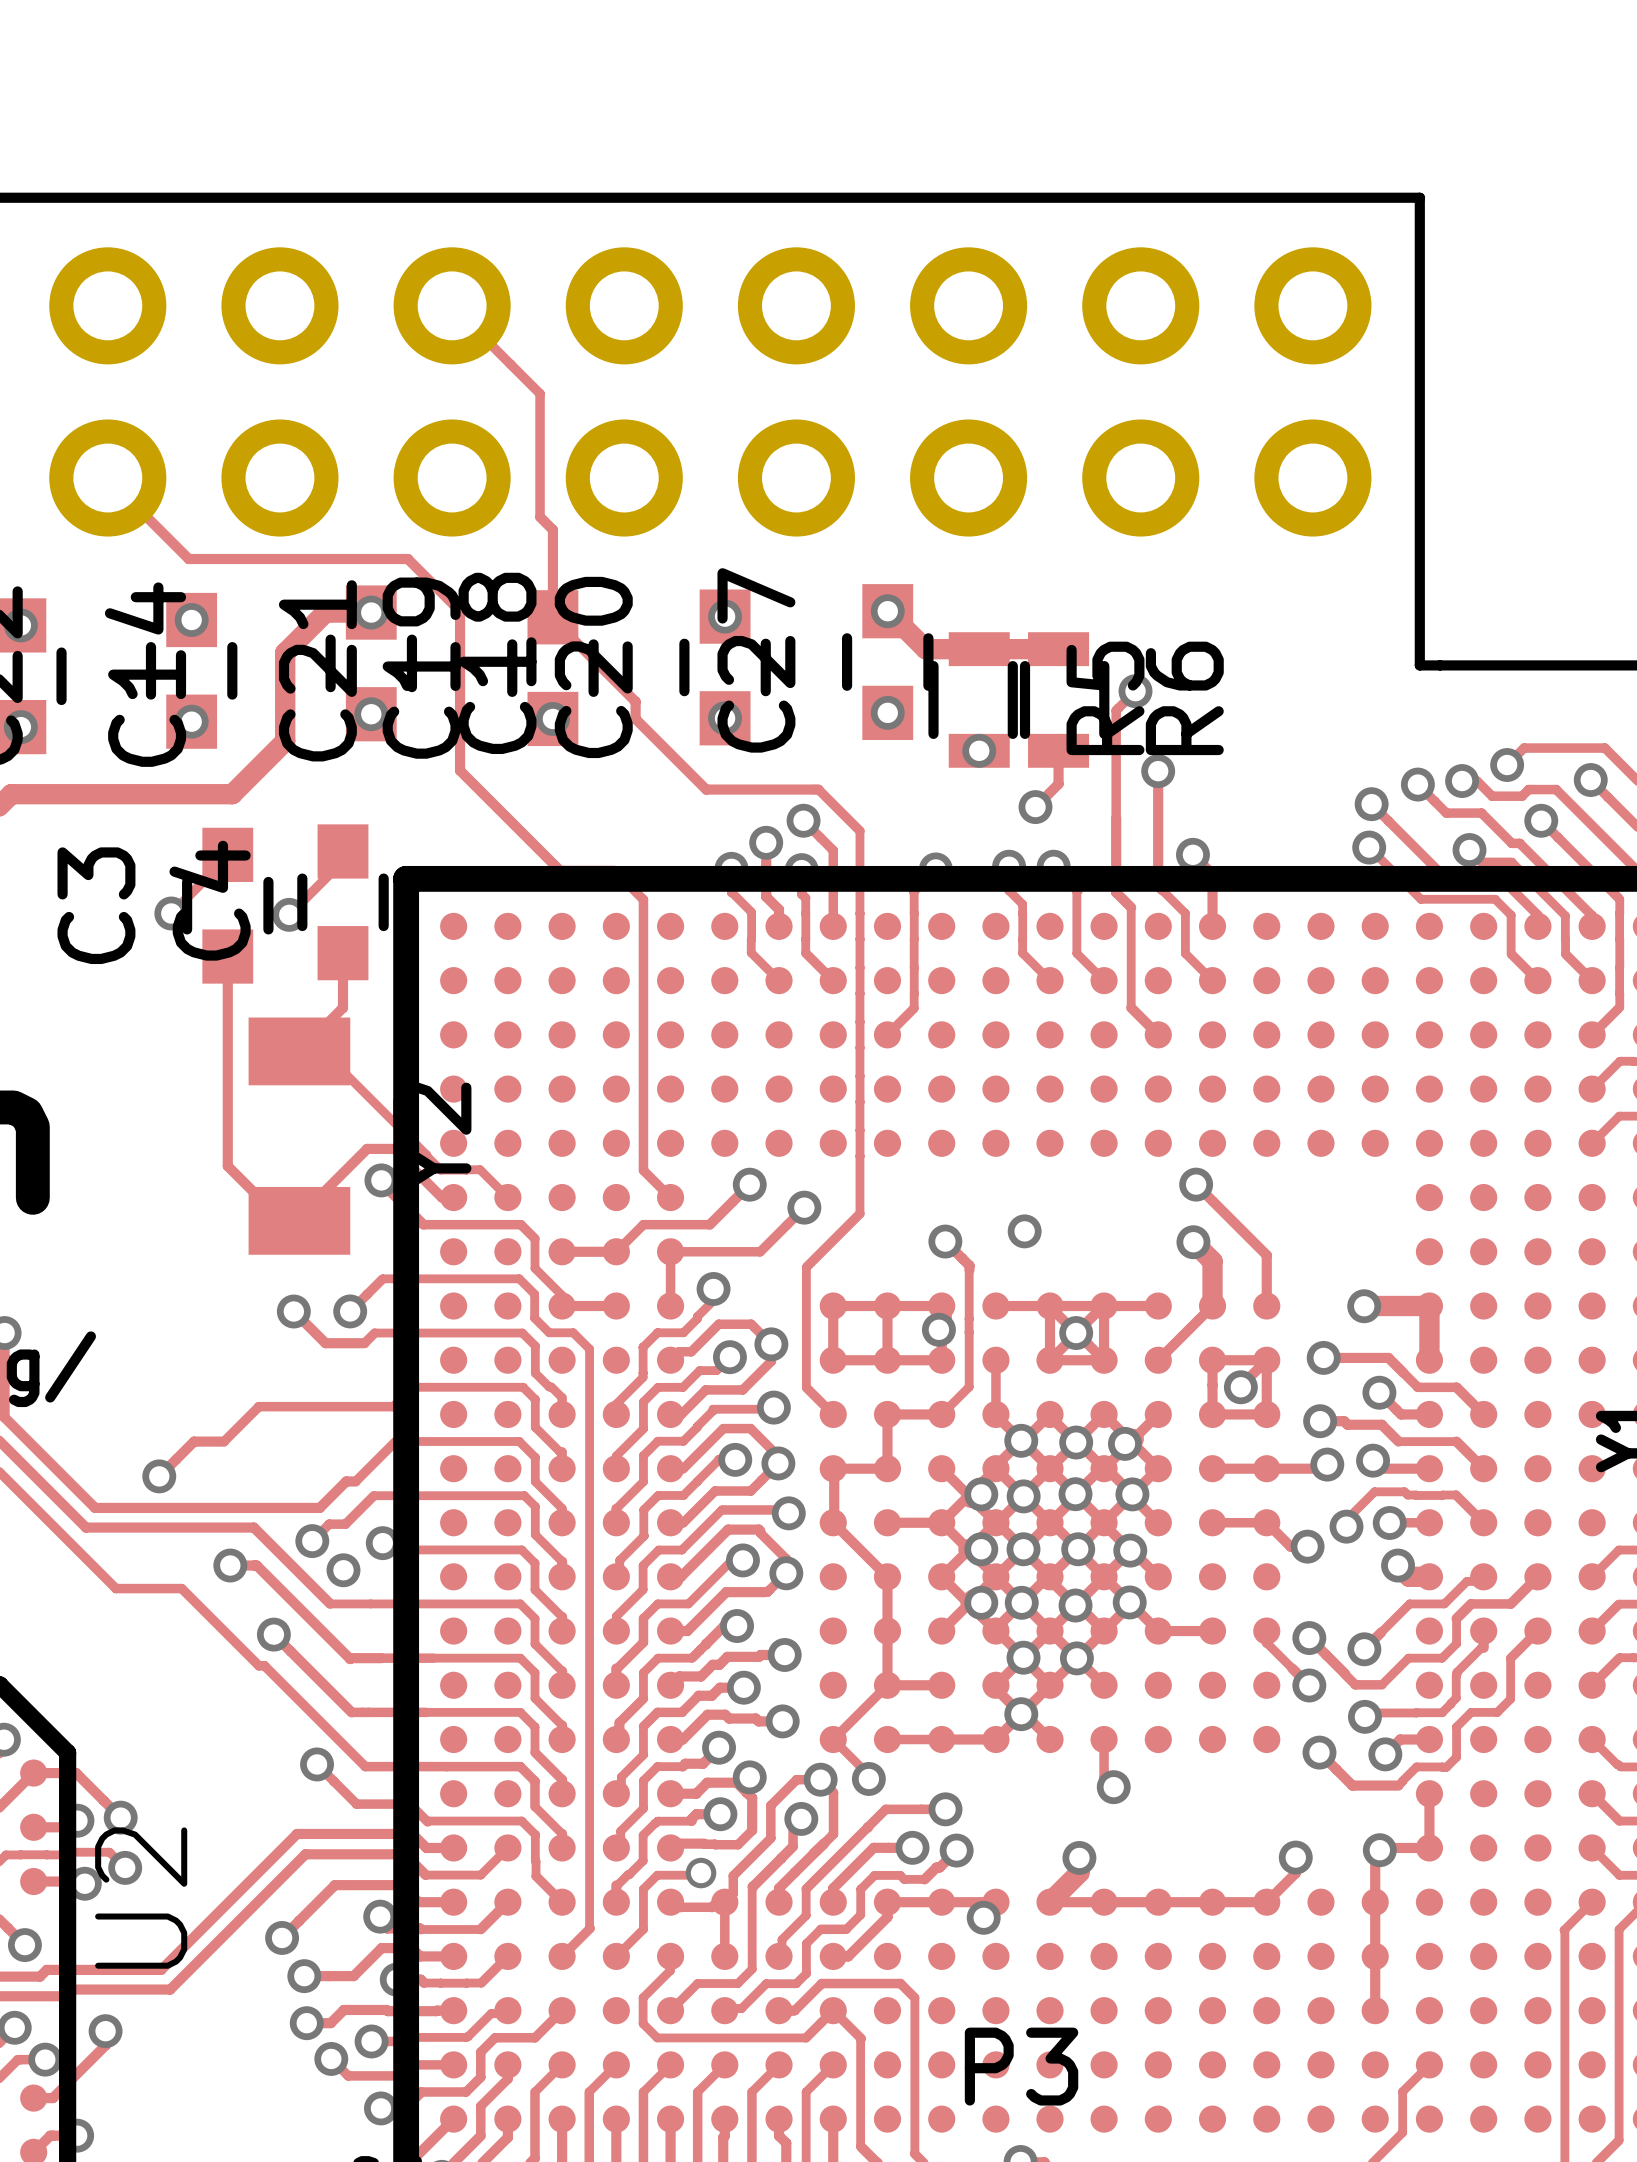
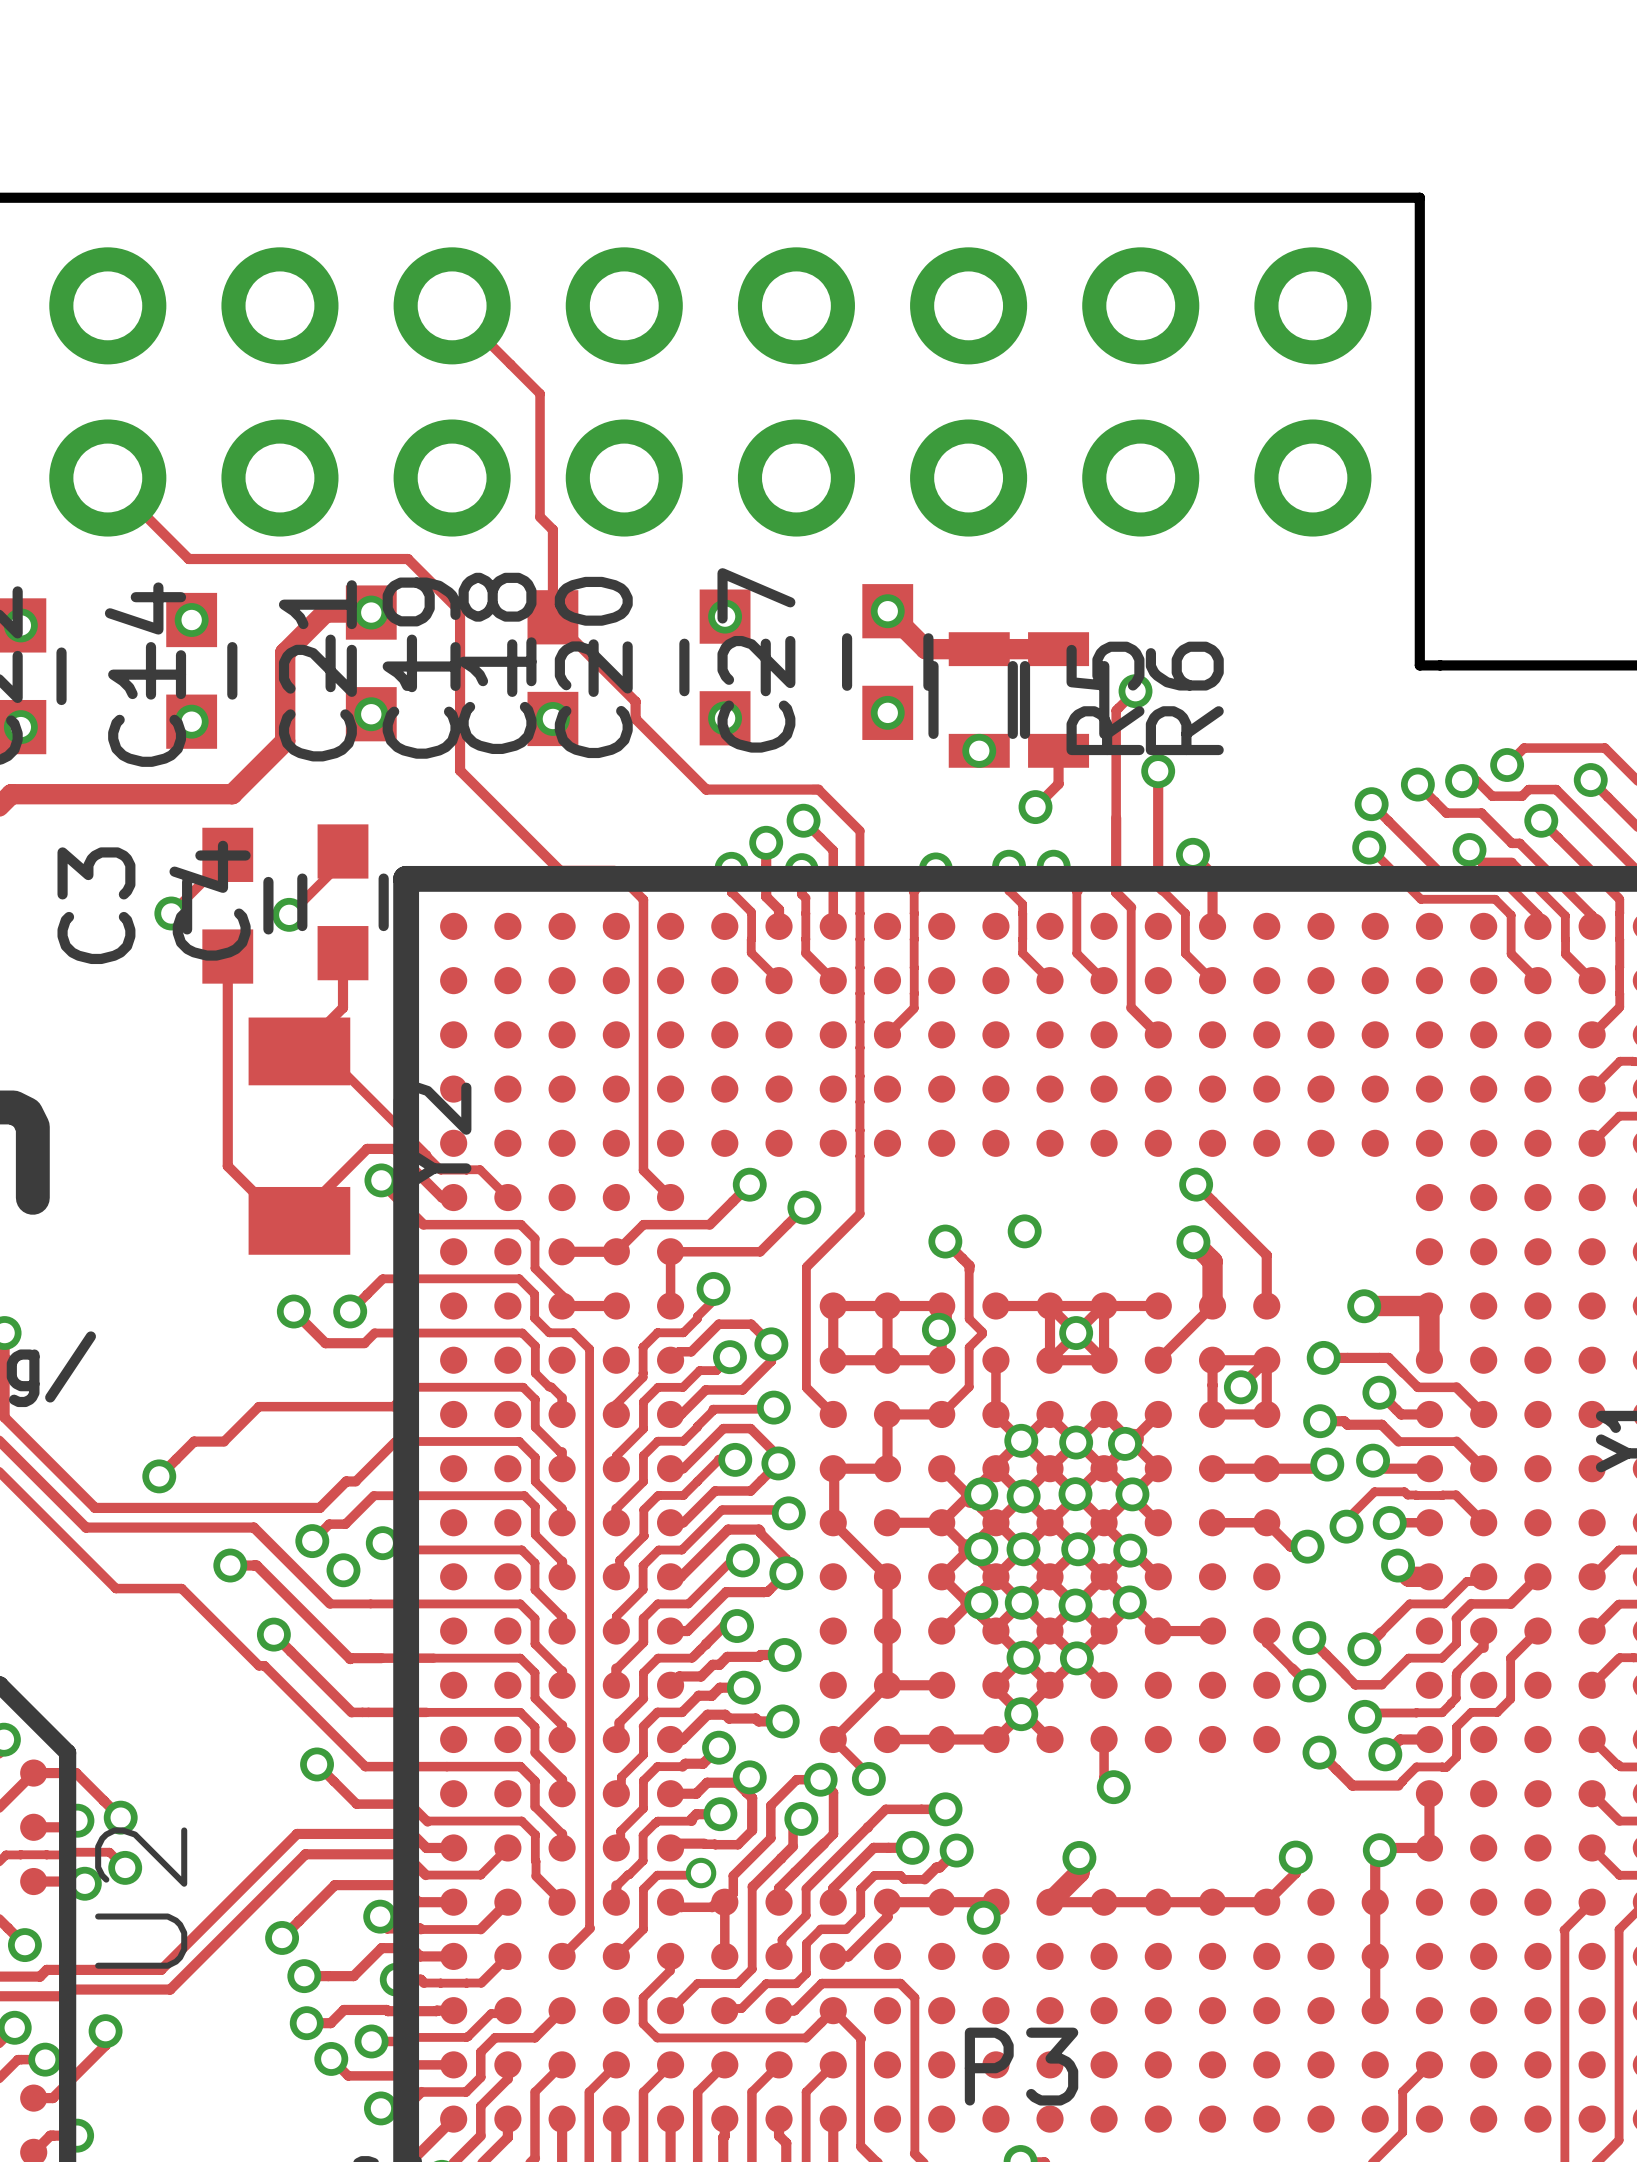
track: (969, 1318) (969, 1347) -> (969, 1318) (982, 1331) (969, 1347)

